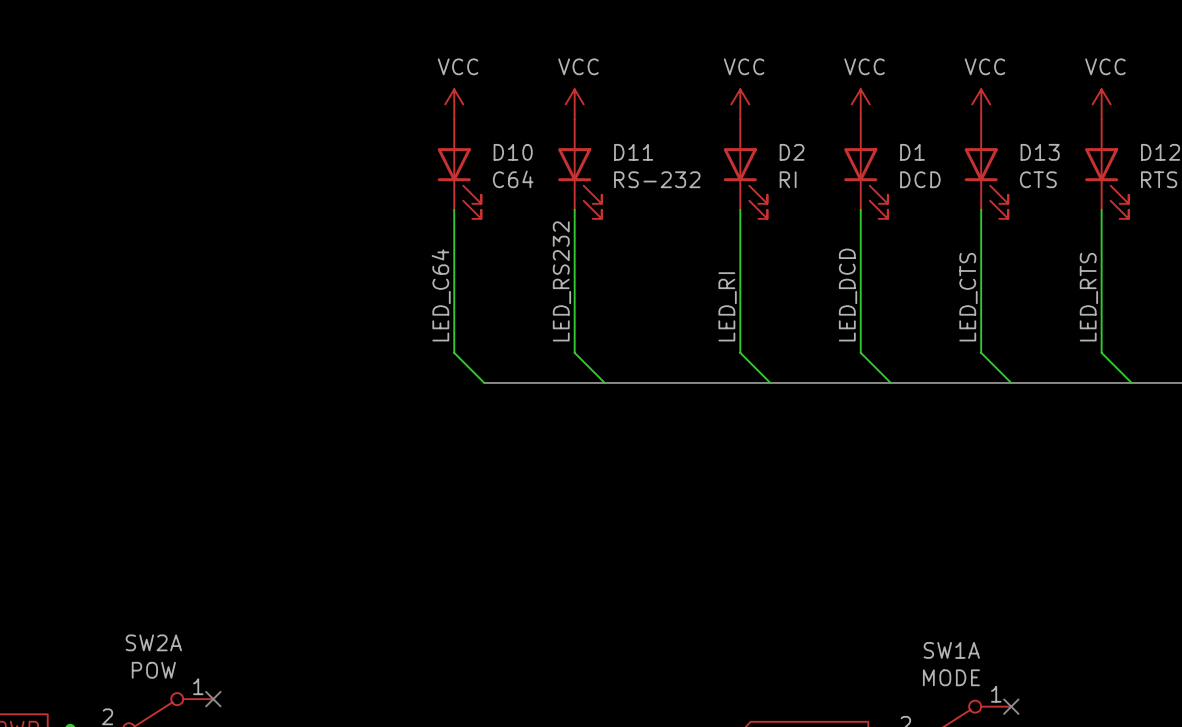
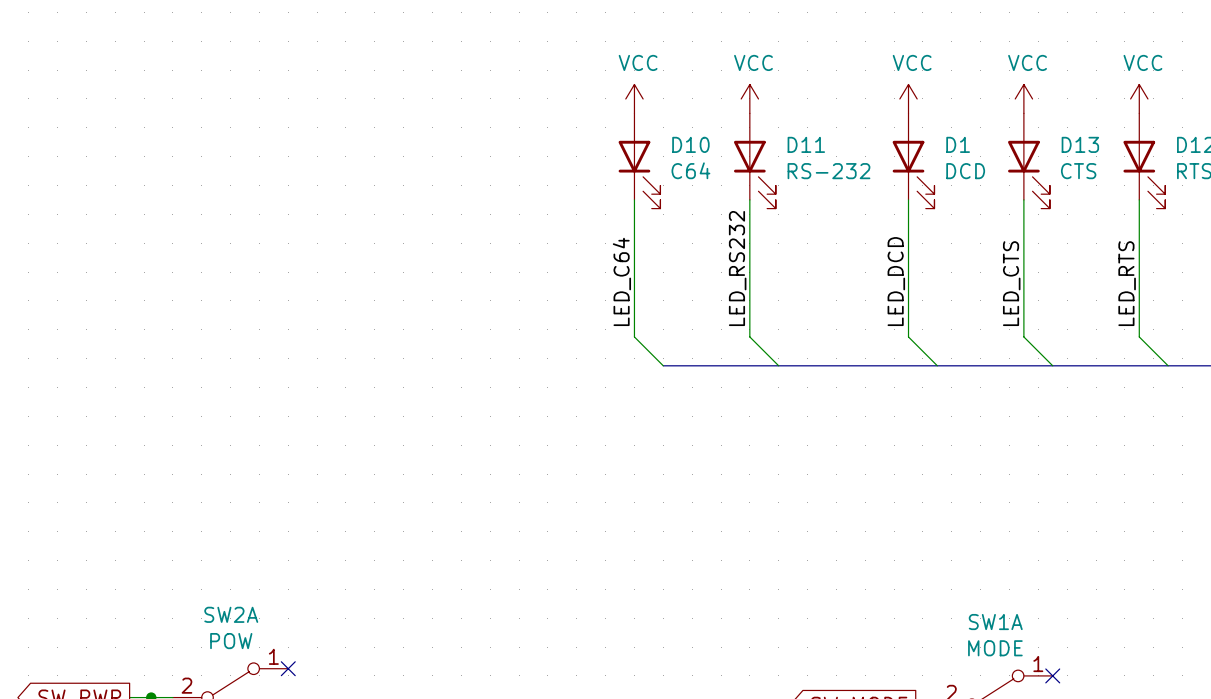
power symbol: VCC (454, 104) -> none
power symbol position: VCC (740, 104) -> VCC (749, 98)
D11 name: D11 (633, 152) -> D10 (690, 144)
D10: C64 (459, 169) -> none
D11: none -> RS-232 (754, 160)
D2: RI (745, 169) -> none
D11 value: RS-232 (657, 179) -> C64 (690, 170)
wire: (454, 209) (454, 352) (484, 382) -> none
wire: (740, 209) (740, 352) (770, 382) -> (749, 199) (749, 336) (778, 365)
label: LED_RS232 (561, 281) -> LED_C64 (621, 281)
label: none -> LED_RS232 (737, 268)
label: LED_C64 (441, 295) -> none
label: LED_RI (727, 306) -> none
bus: (484, 382) (604, 382) -> none

